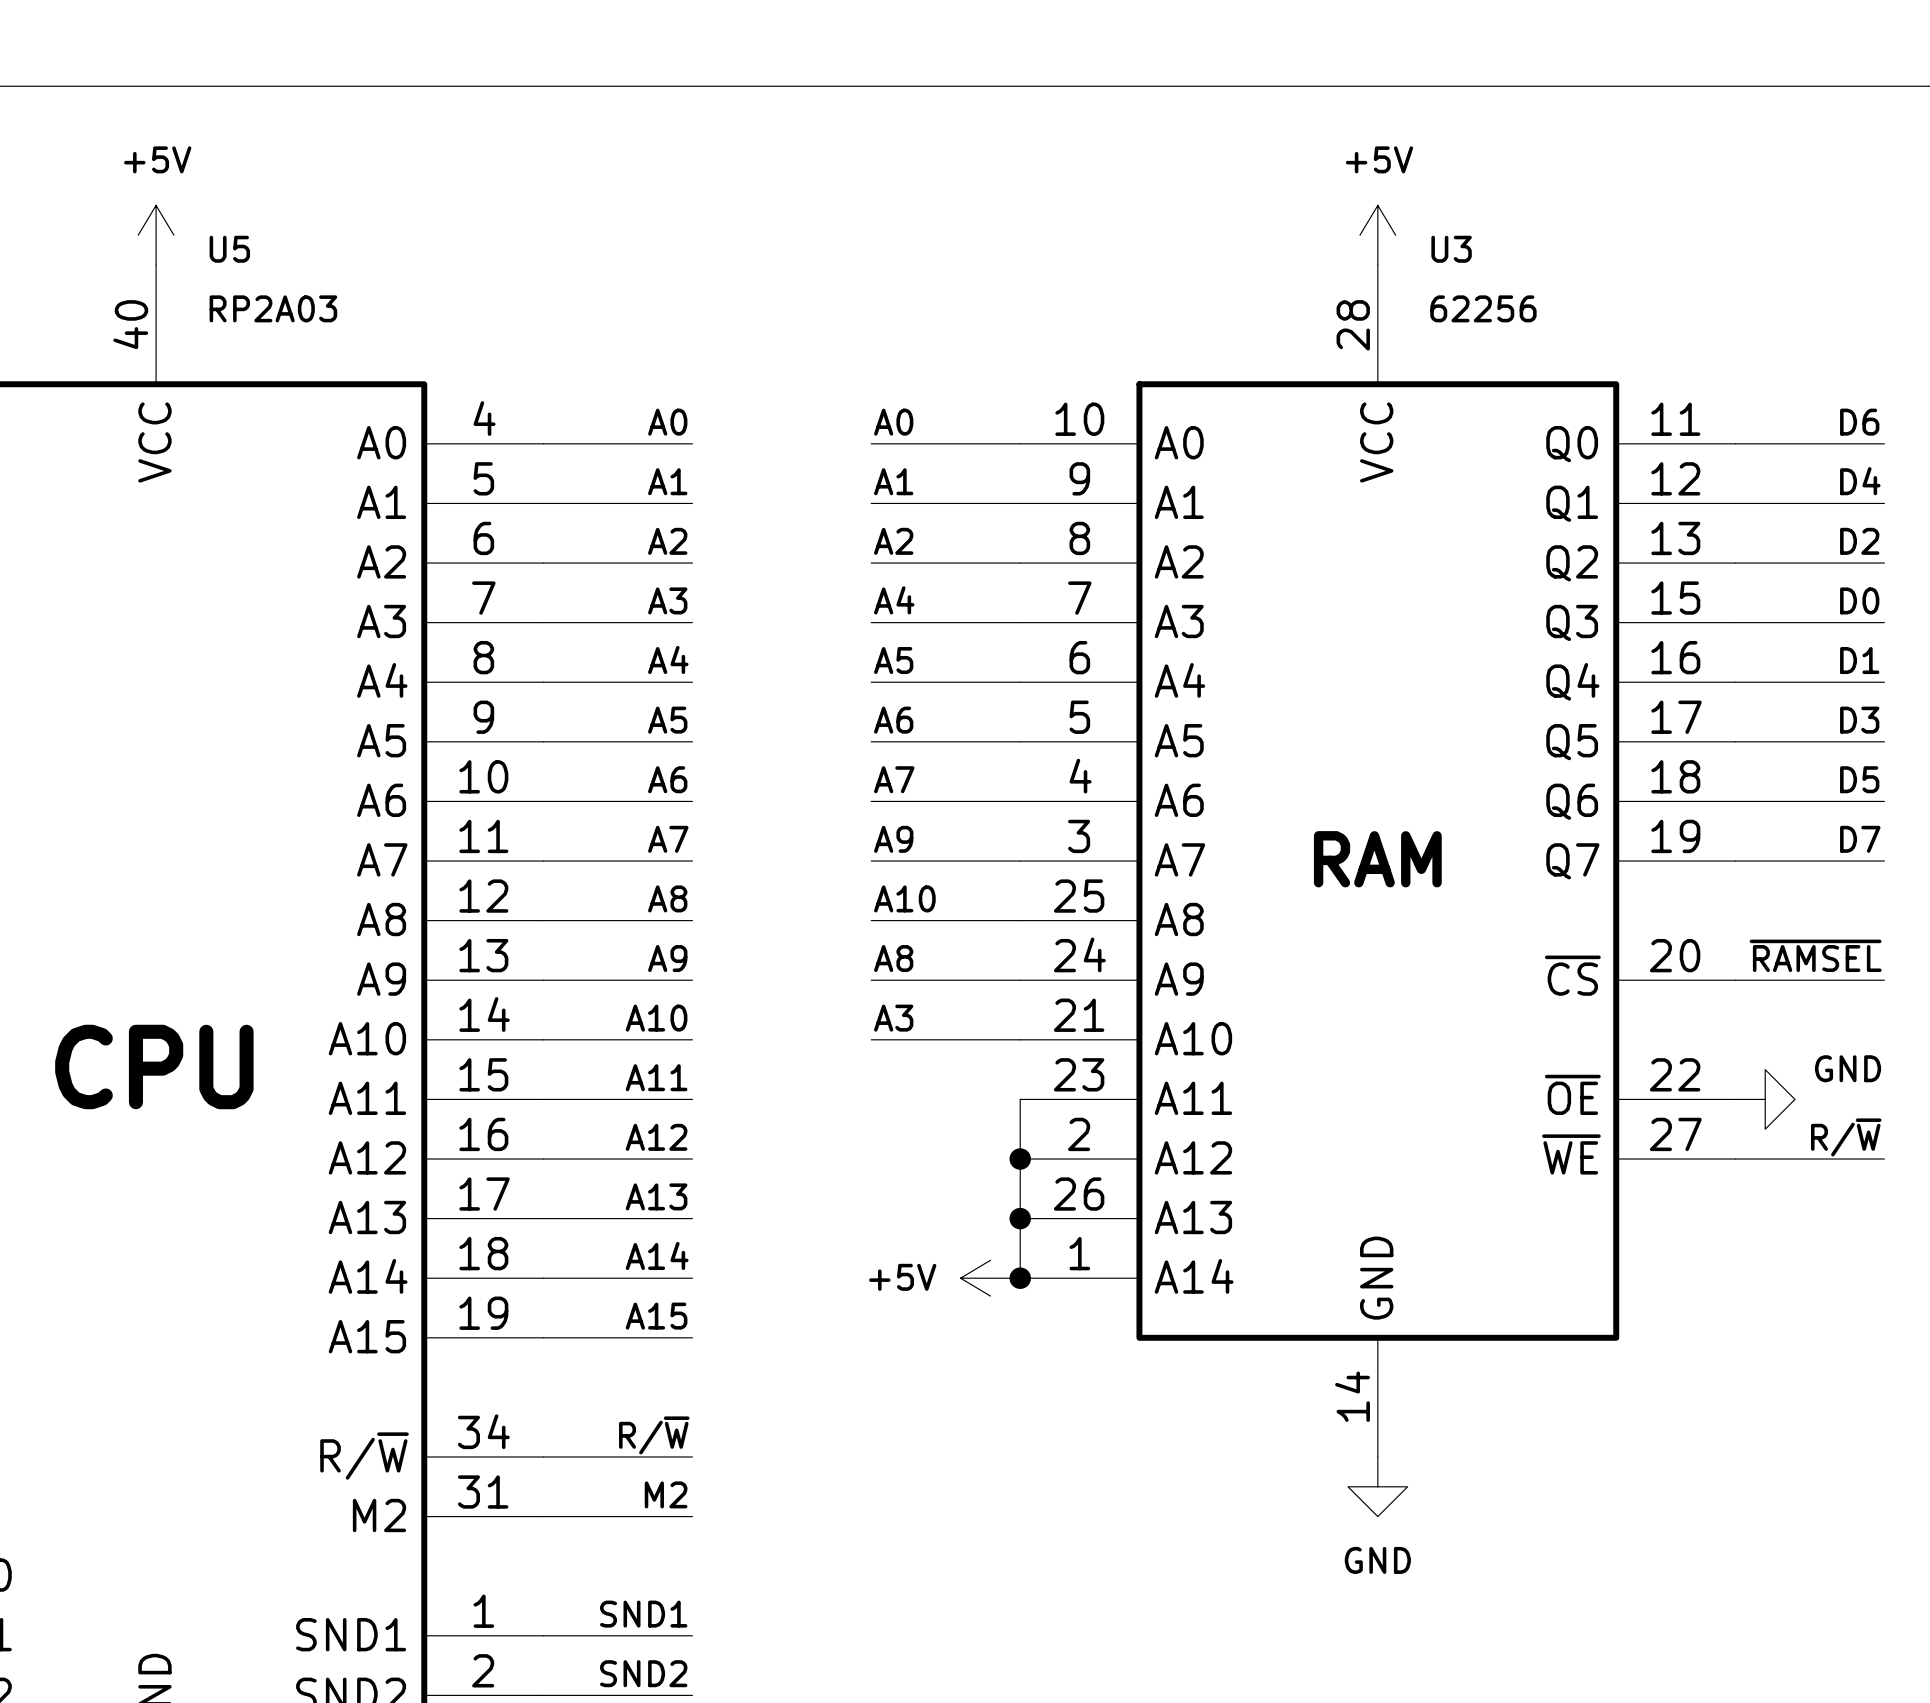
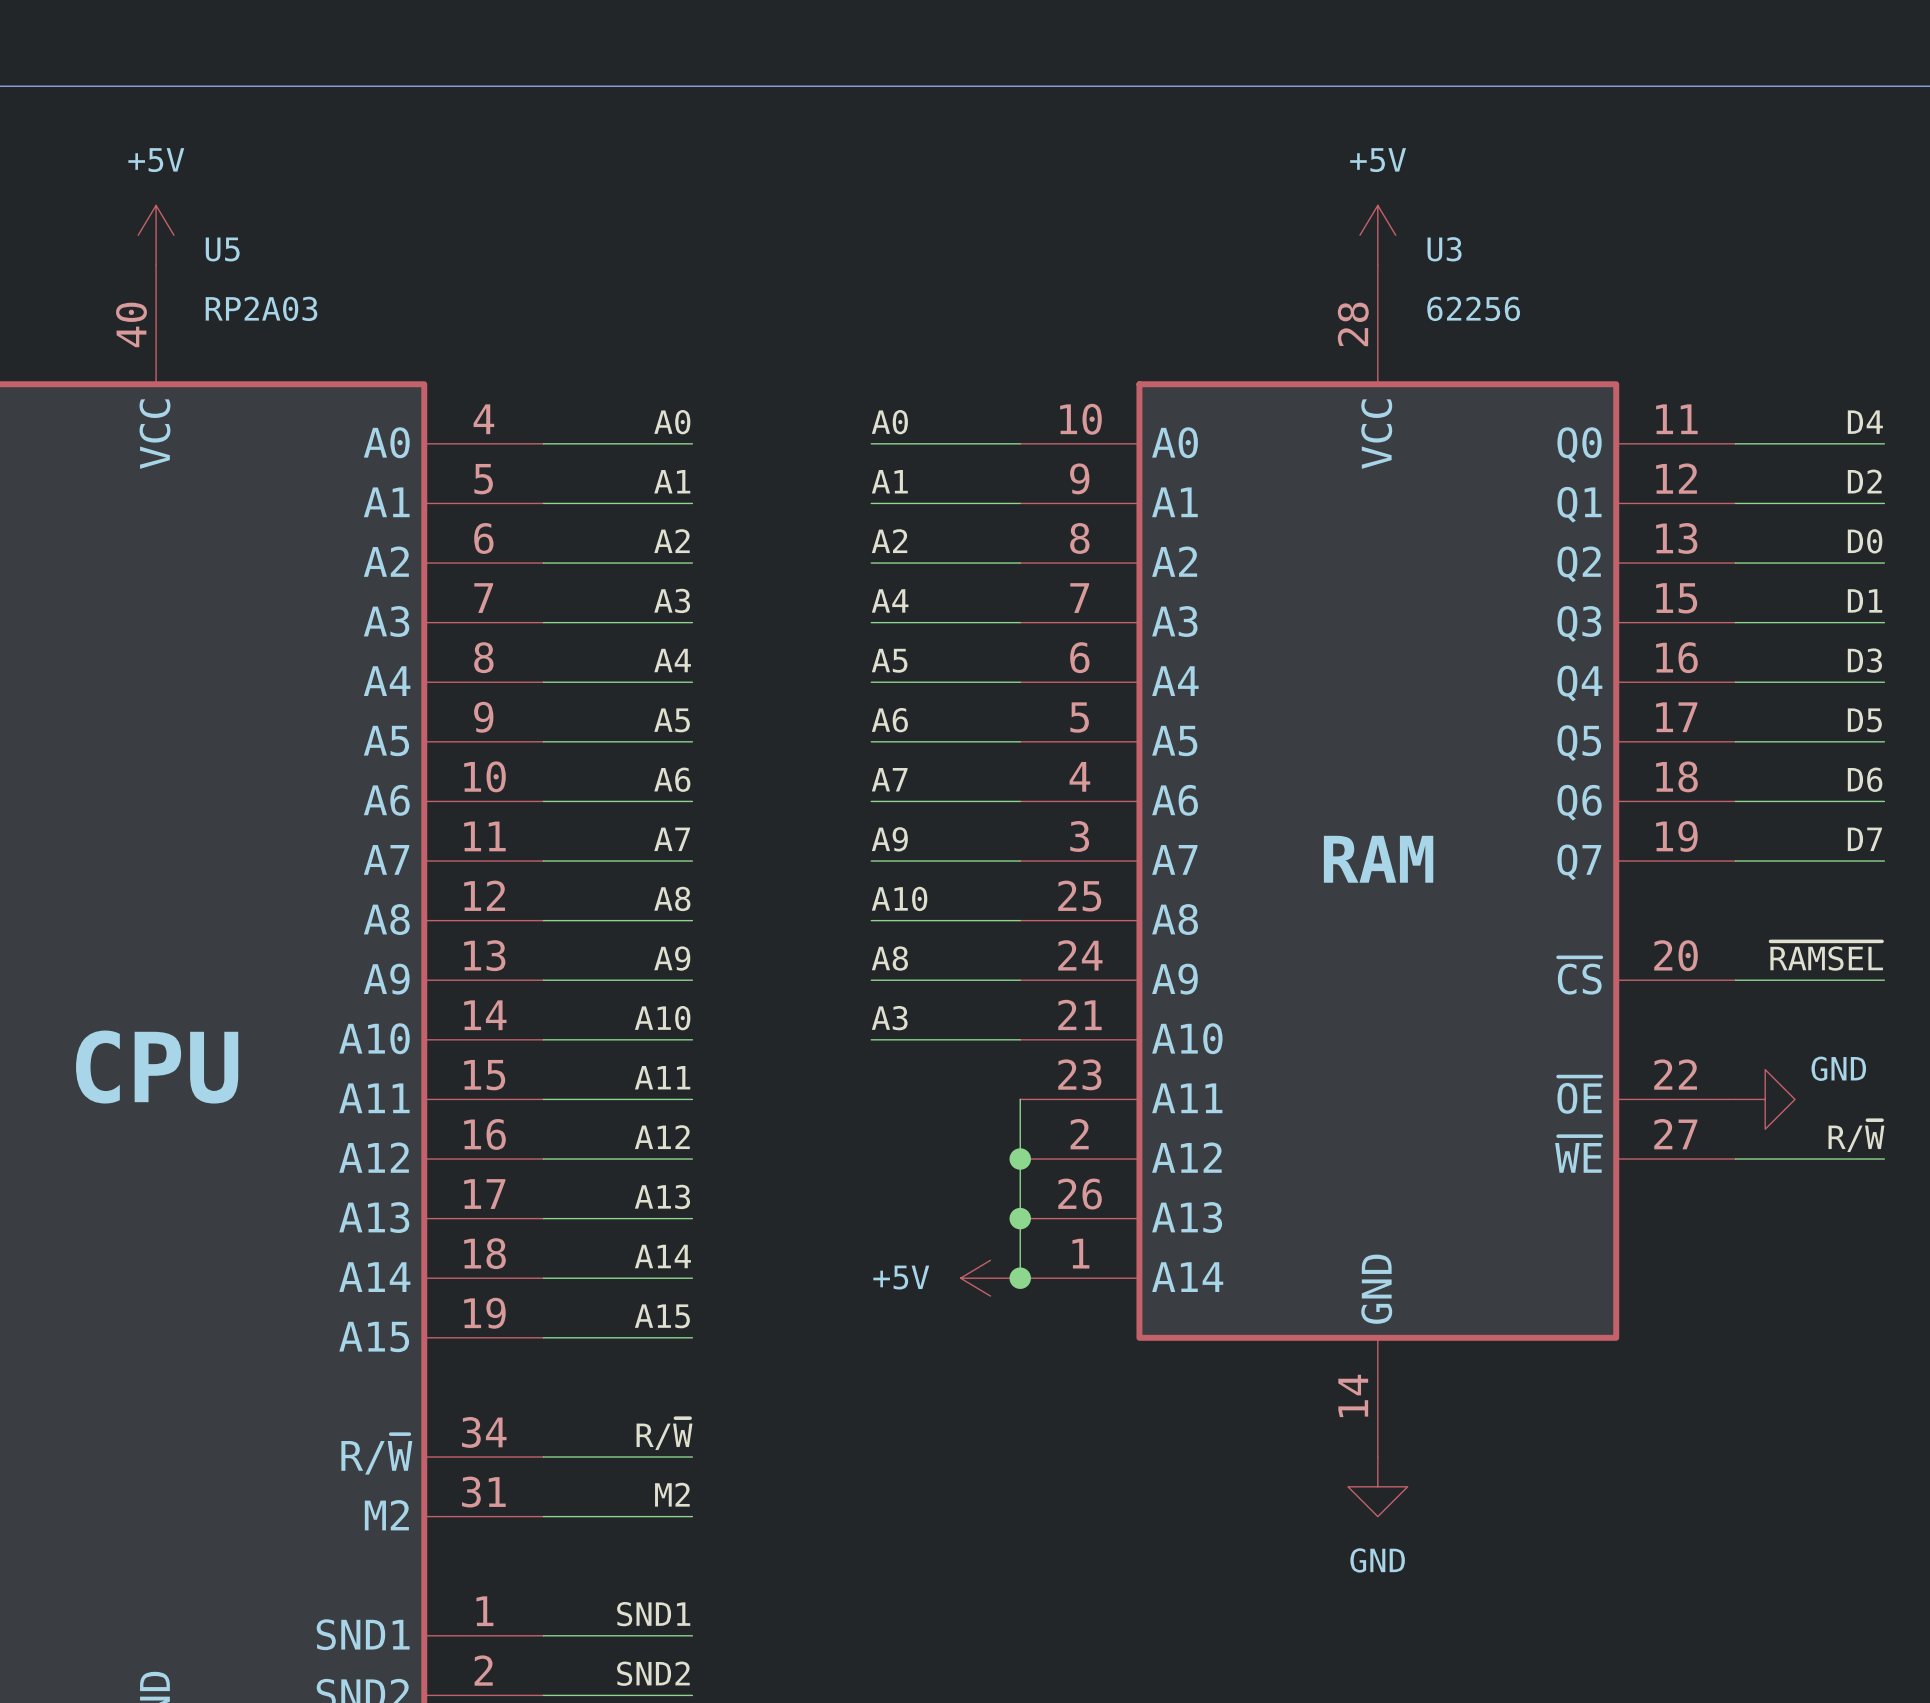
label: D6 (1859, 422) -> D4 (1865, 422)
label: D4 (1860, 481) -> D2 (1864, 481)
label: D2 (1859, 541) -> D0 (1865, 541)
label: D0 (1859, 600) -> D1 (1865, 600)
label: D1 (1859, 660) -> D3 (1864, 660)
label: D3 (1859, 720) -> D5 (1864, 720)
label: D5 (1859, 779) -> D6 (1865, 779)

